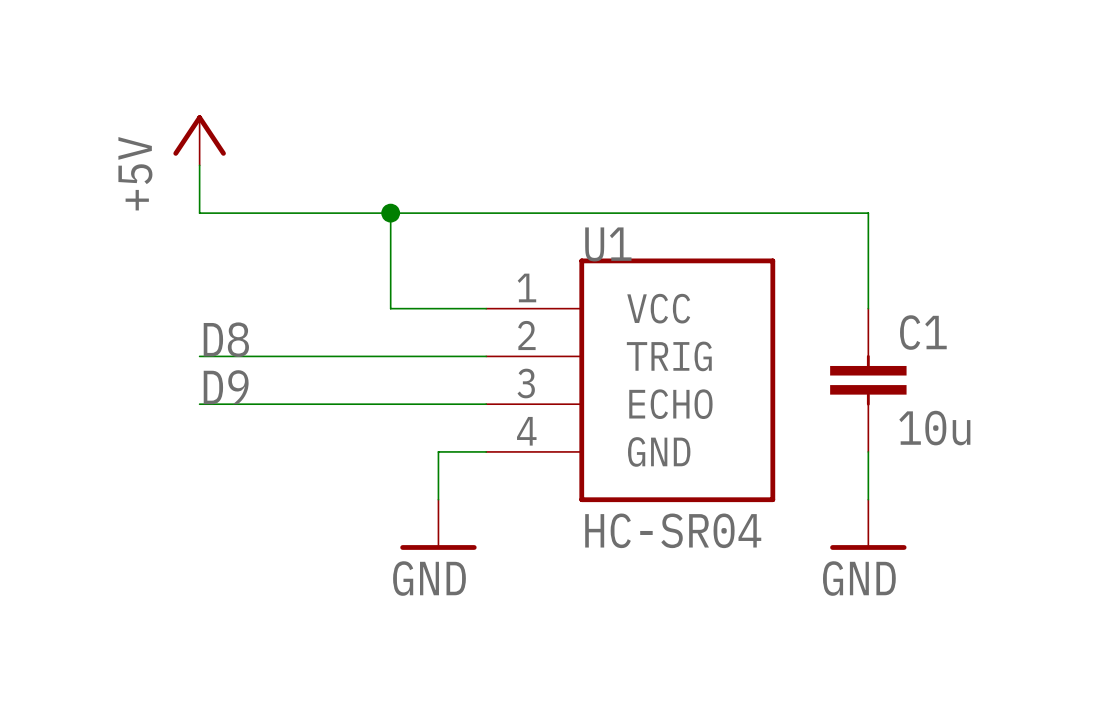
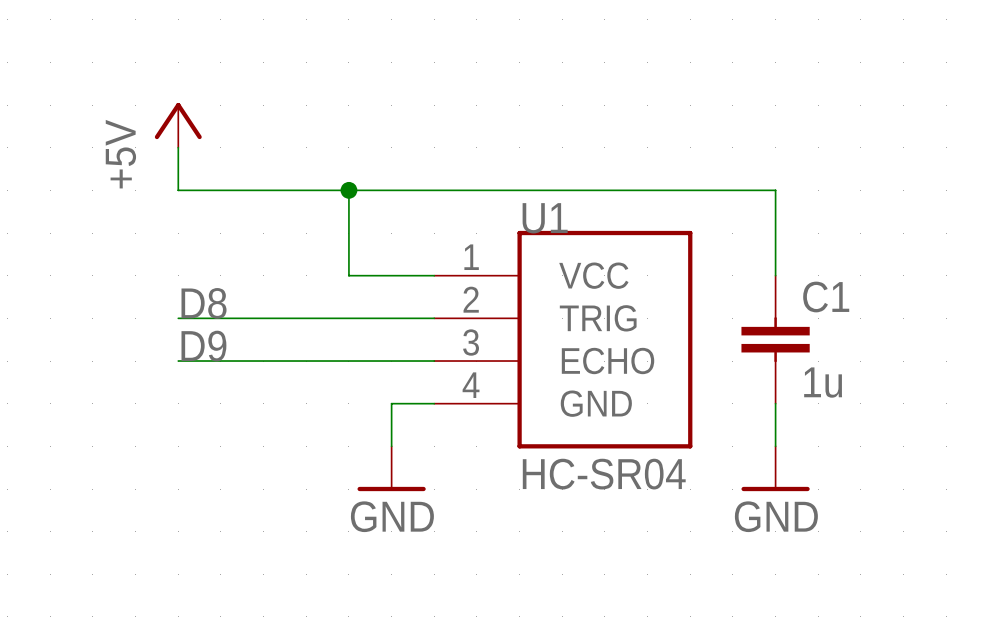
C1 value: 10u (934, 428) -> 1u (823, 382)

